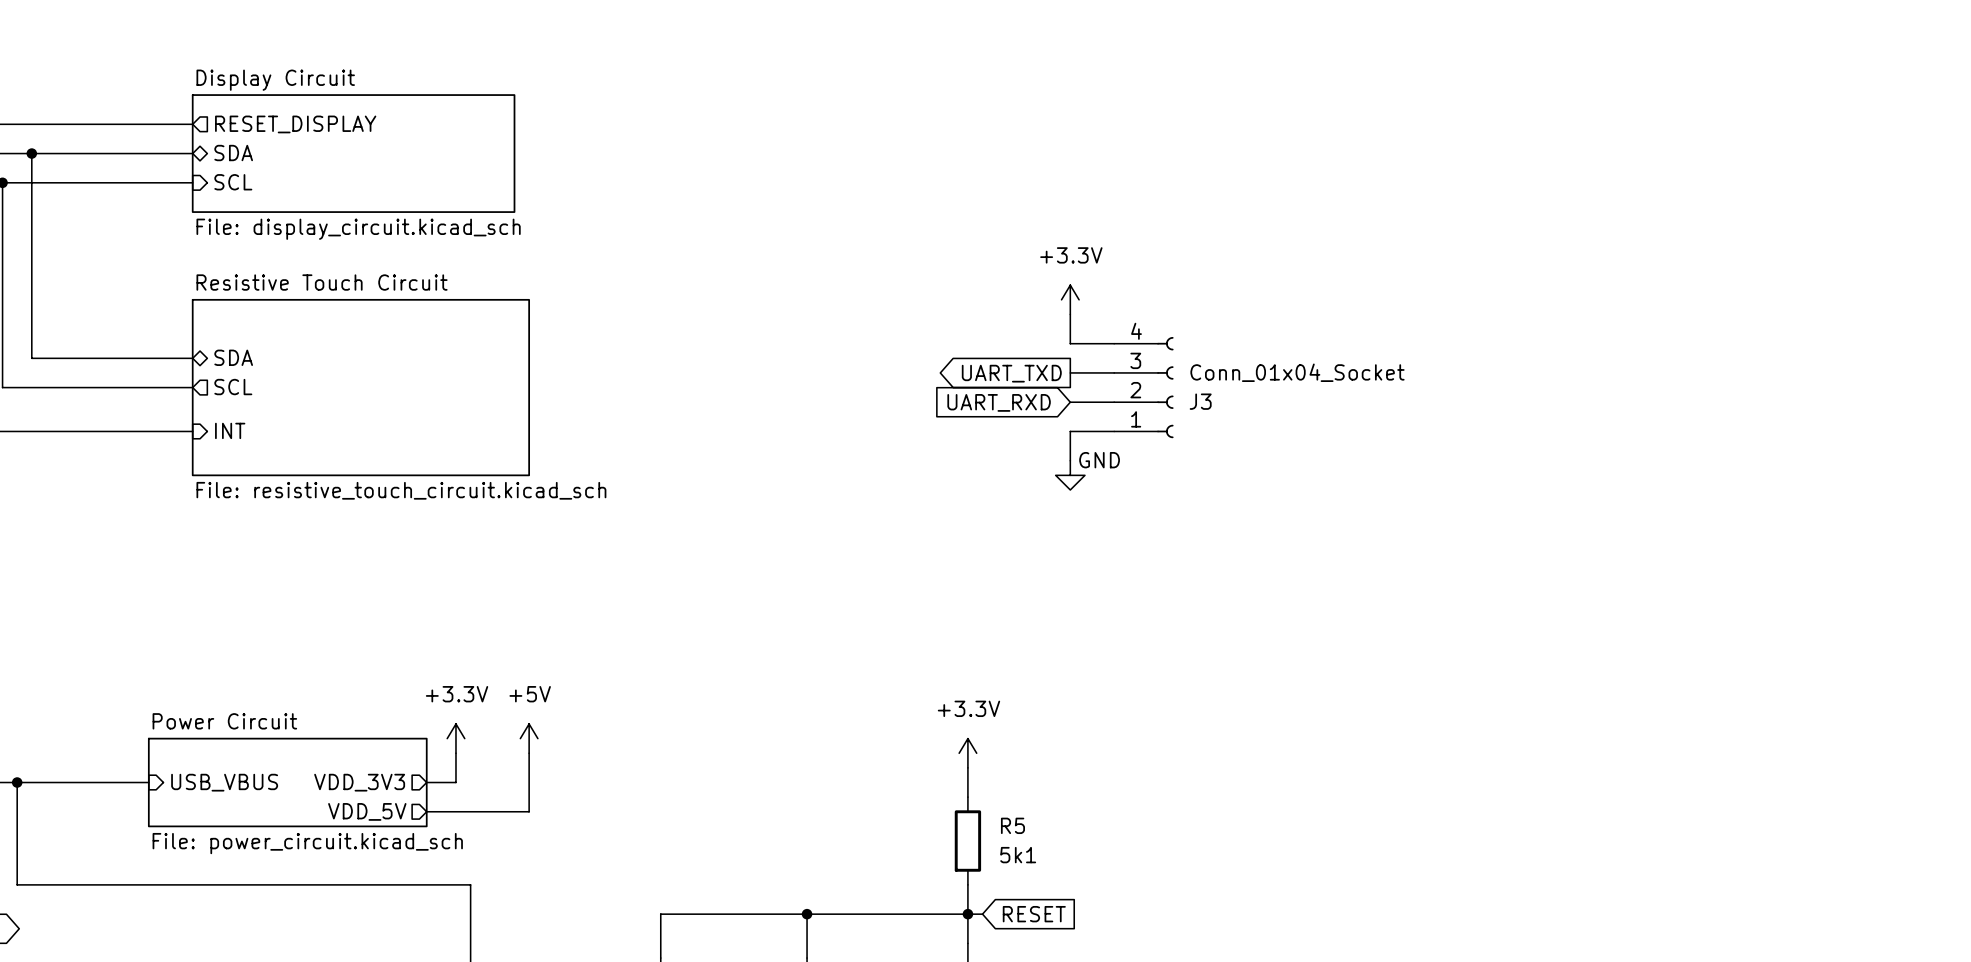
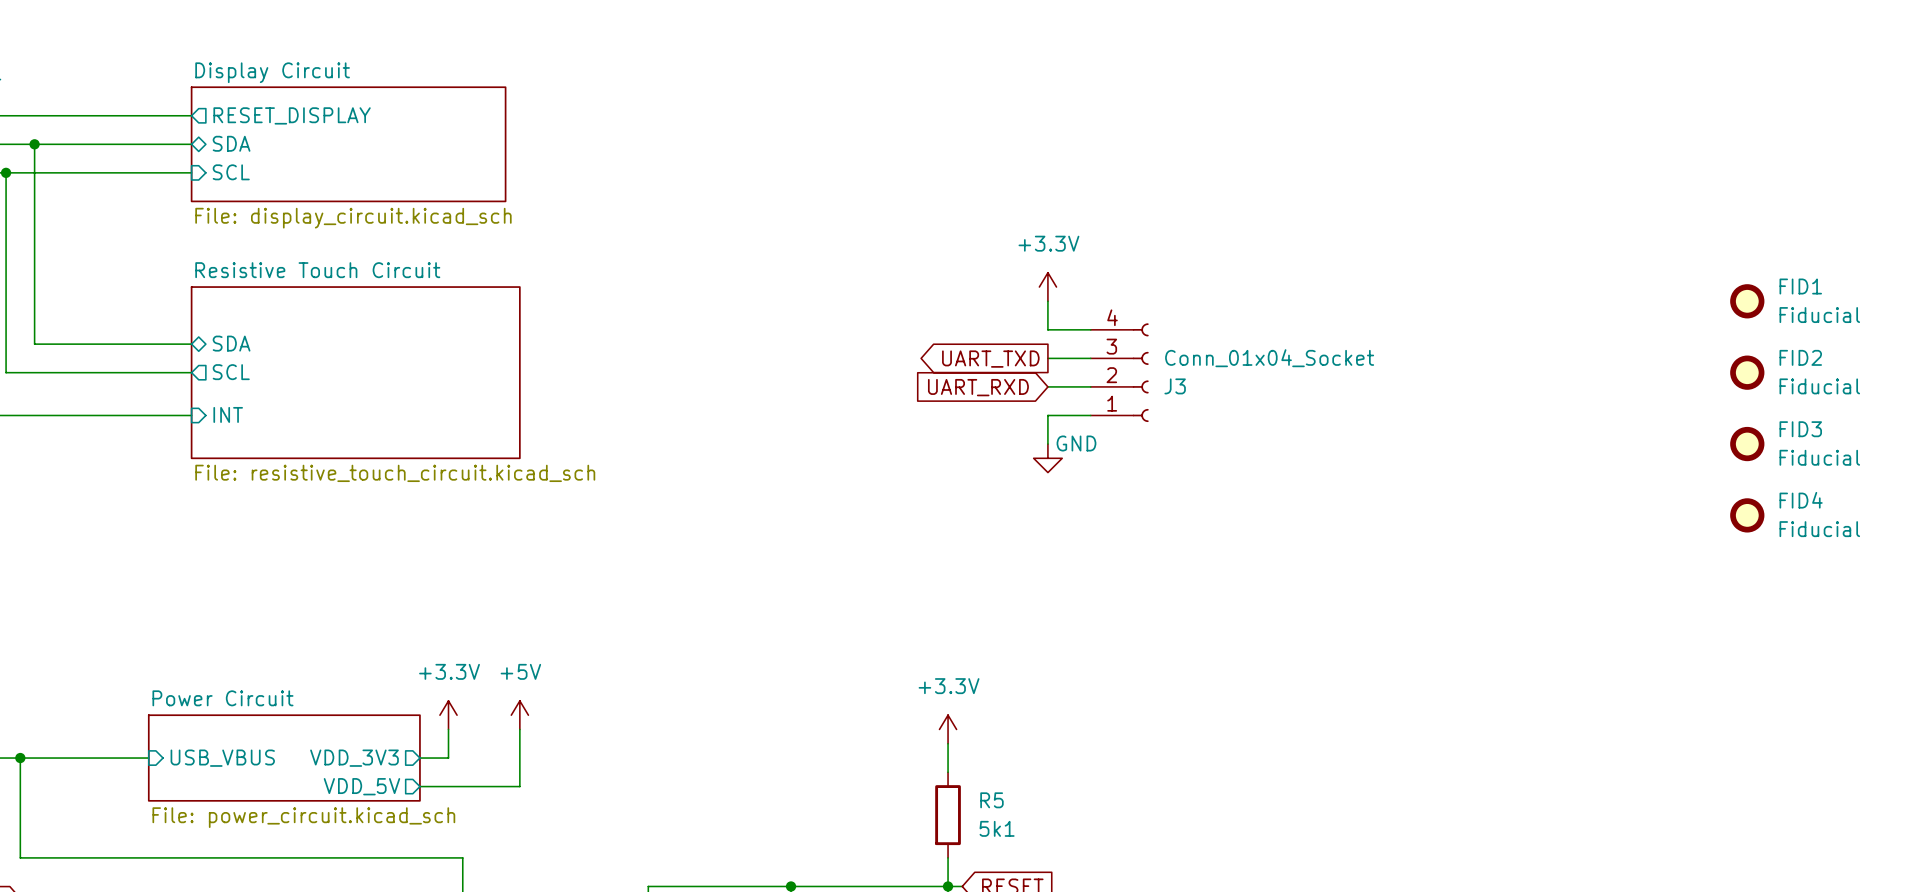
FID1: none -> Fiducial (1747, 301)
FID2: none -> Fiducial (1747, 372)
FID3: none -> Fiducial (1747, 444)
FID4: none -> Fiducial (1747, 515)

